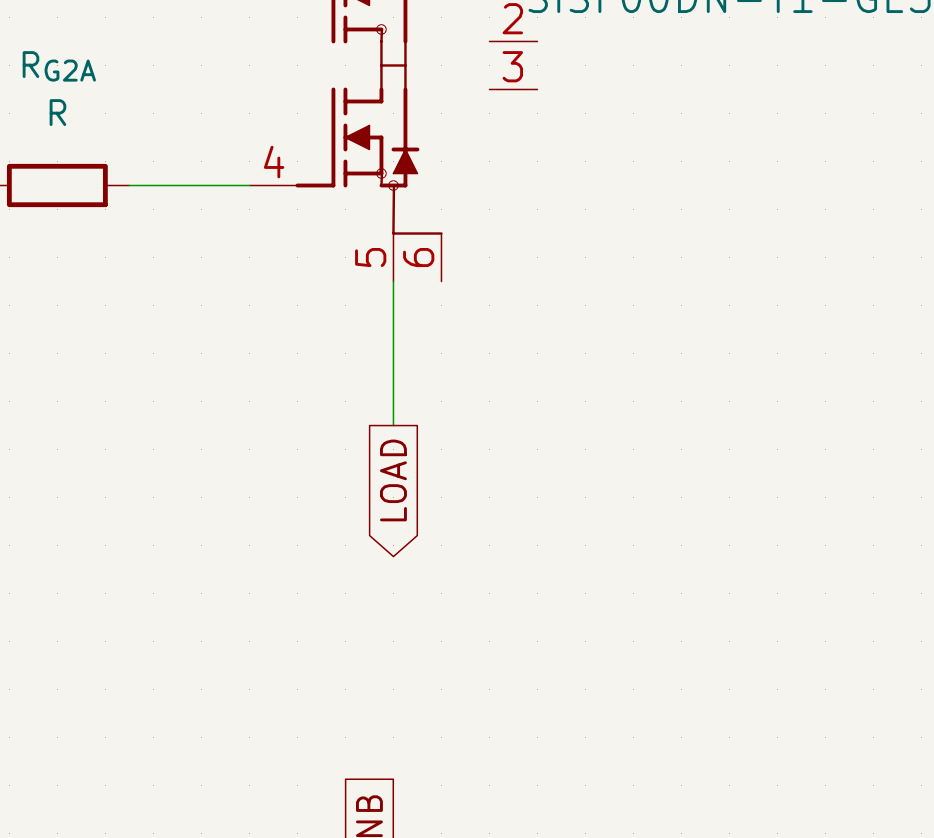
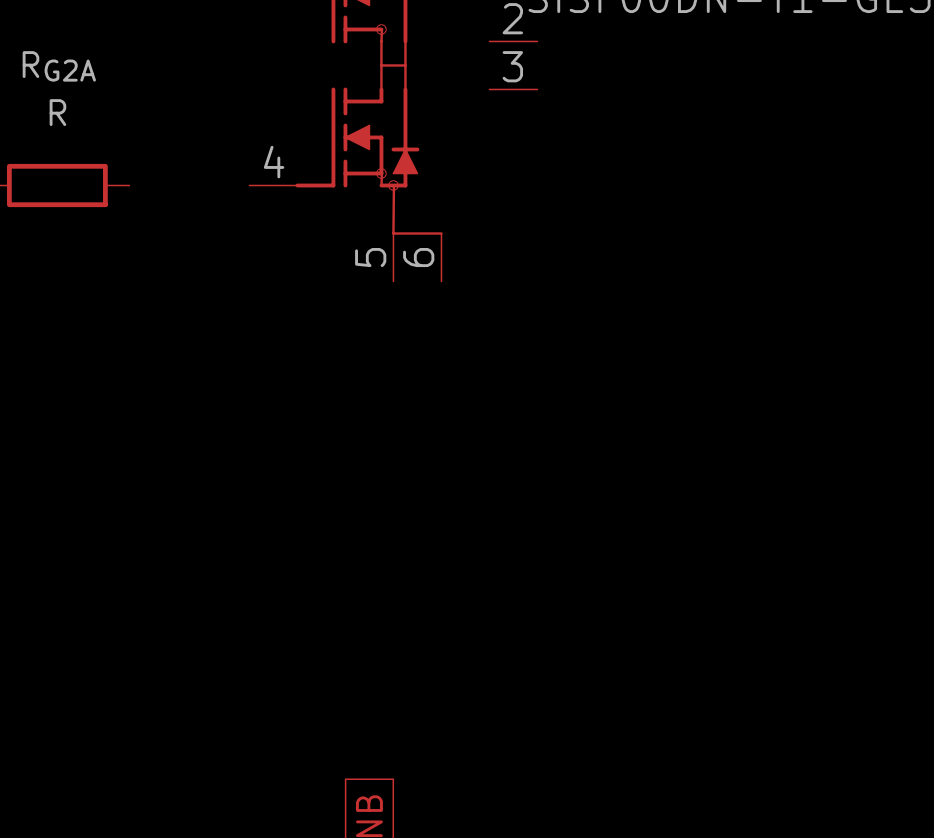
wire: (129, 185) (249, 185) -> none
wire: (393, 281) (393, 425) -> none
global label: LOAD (393, 480) -> none

